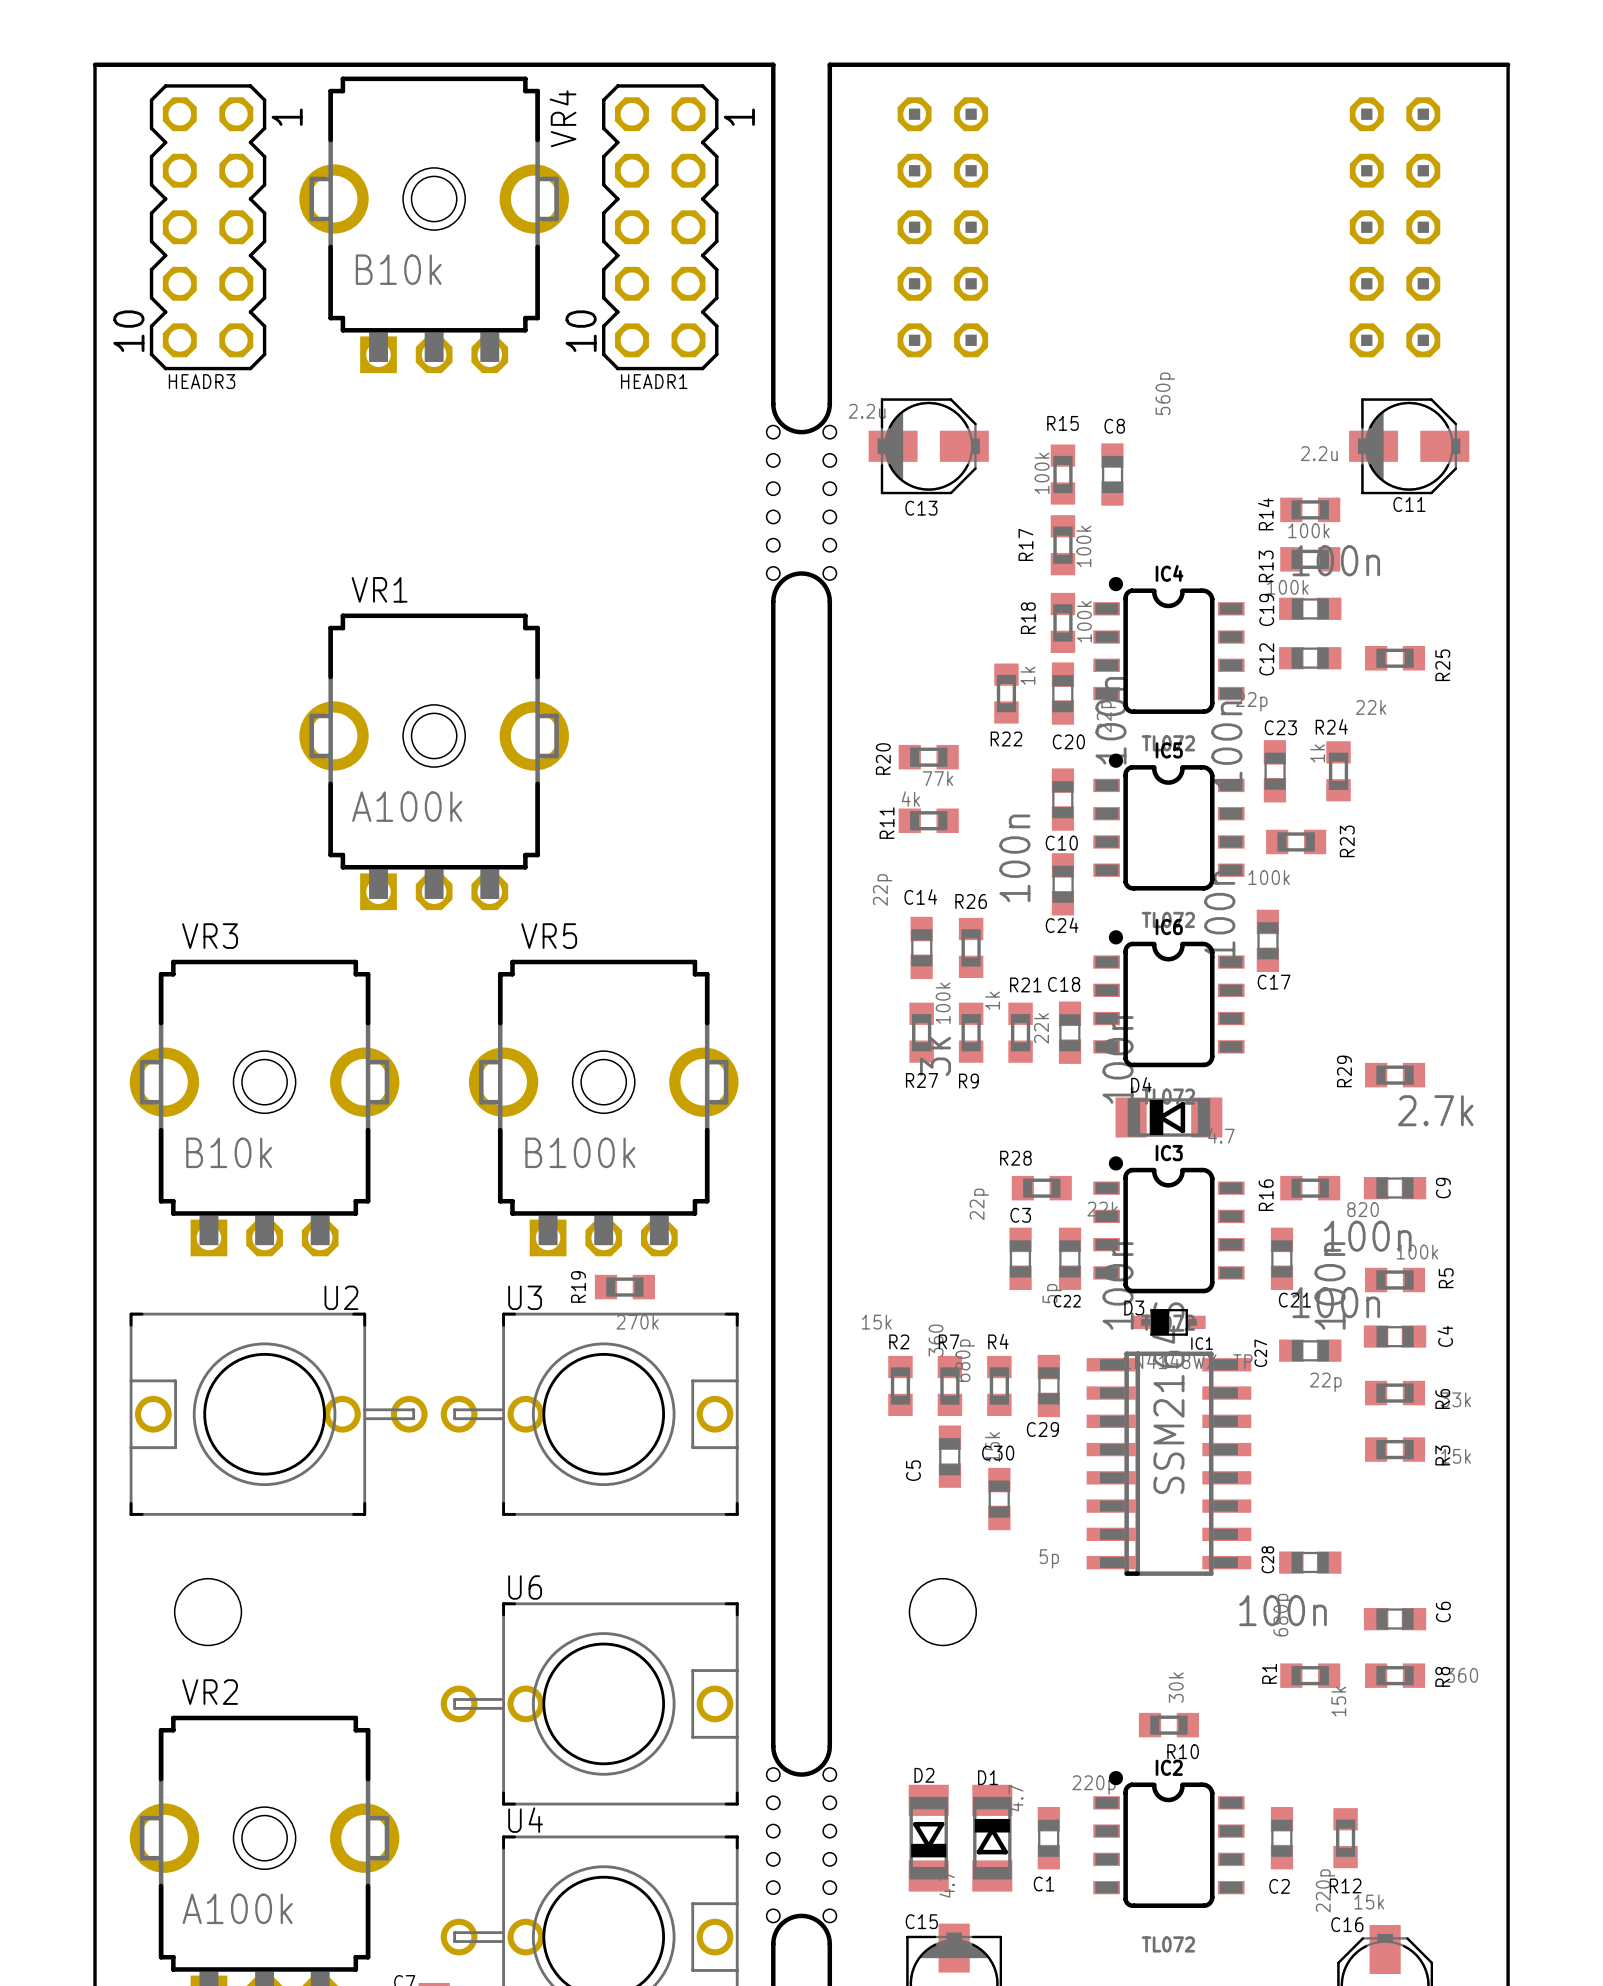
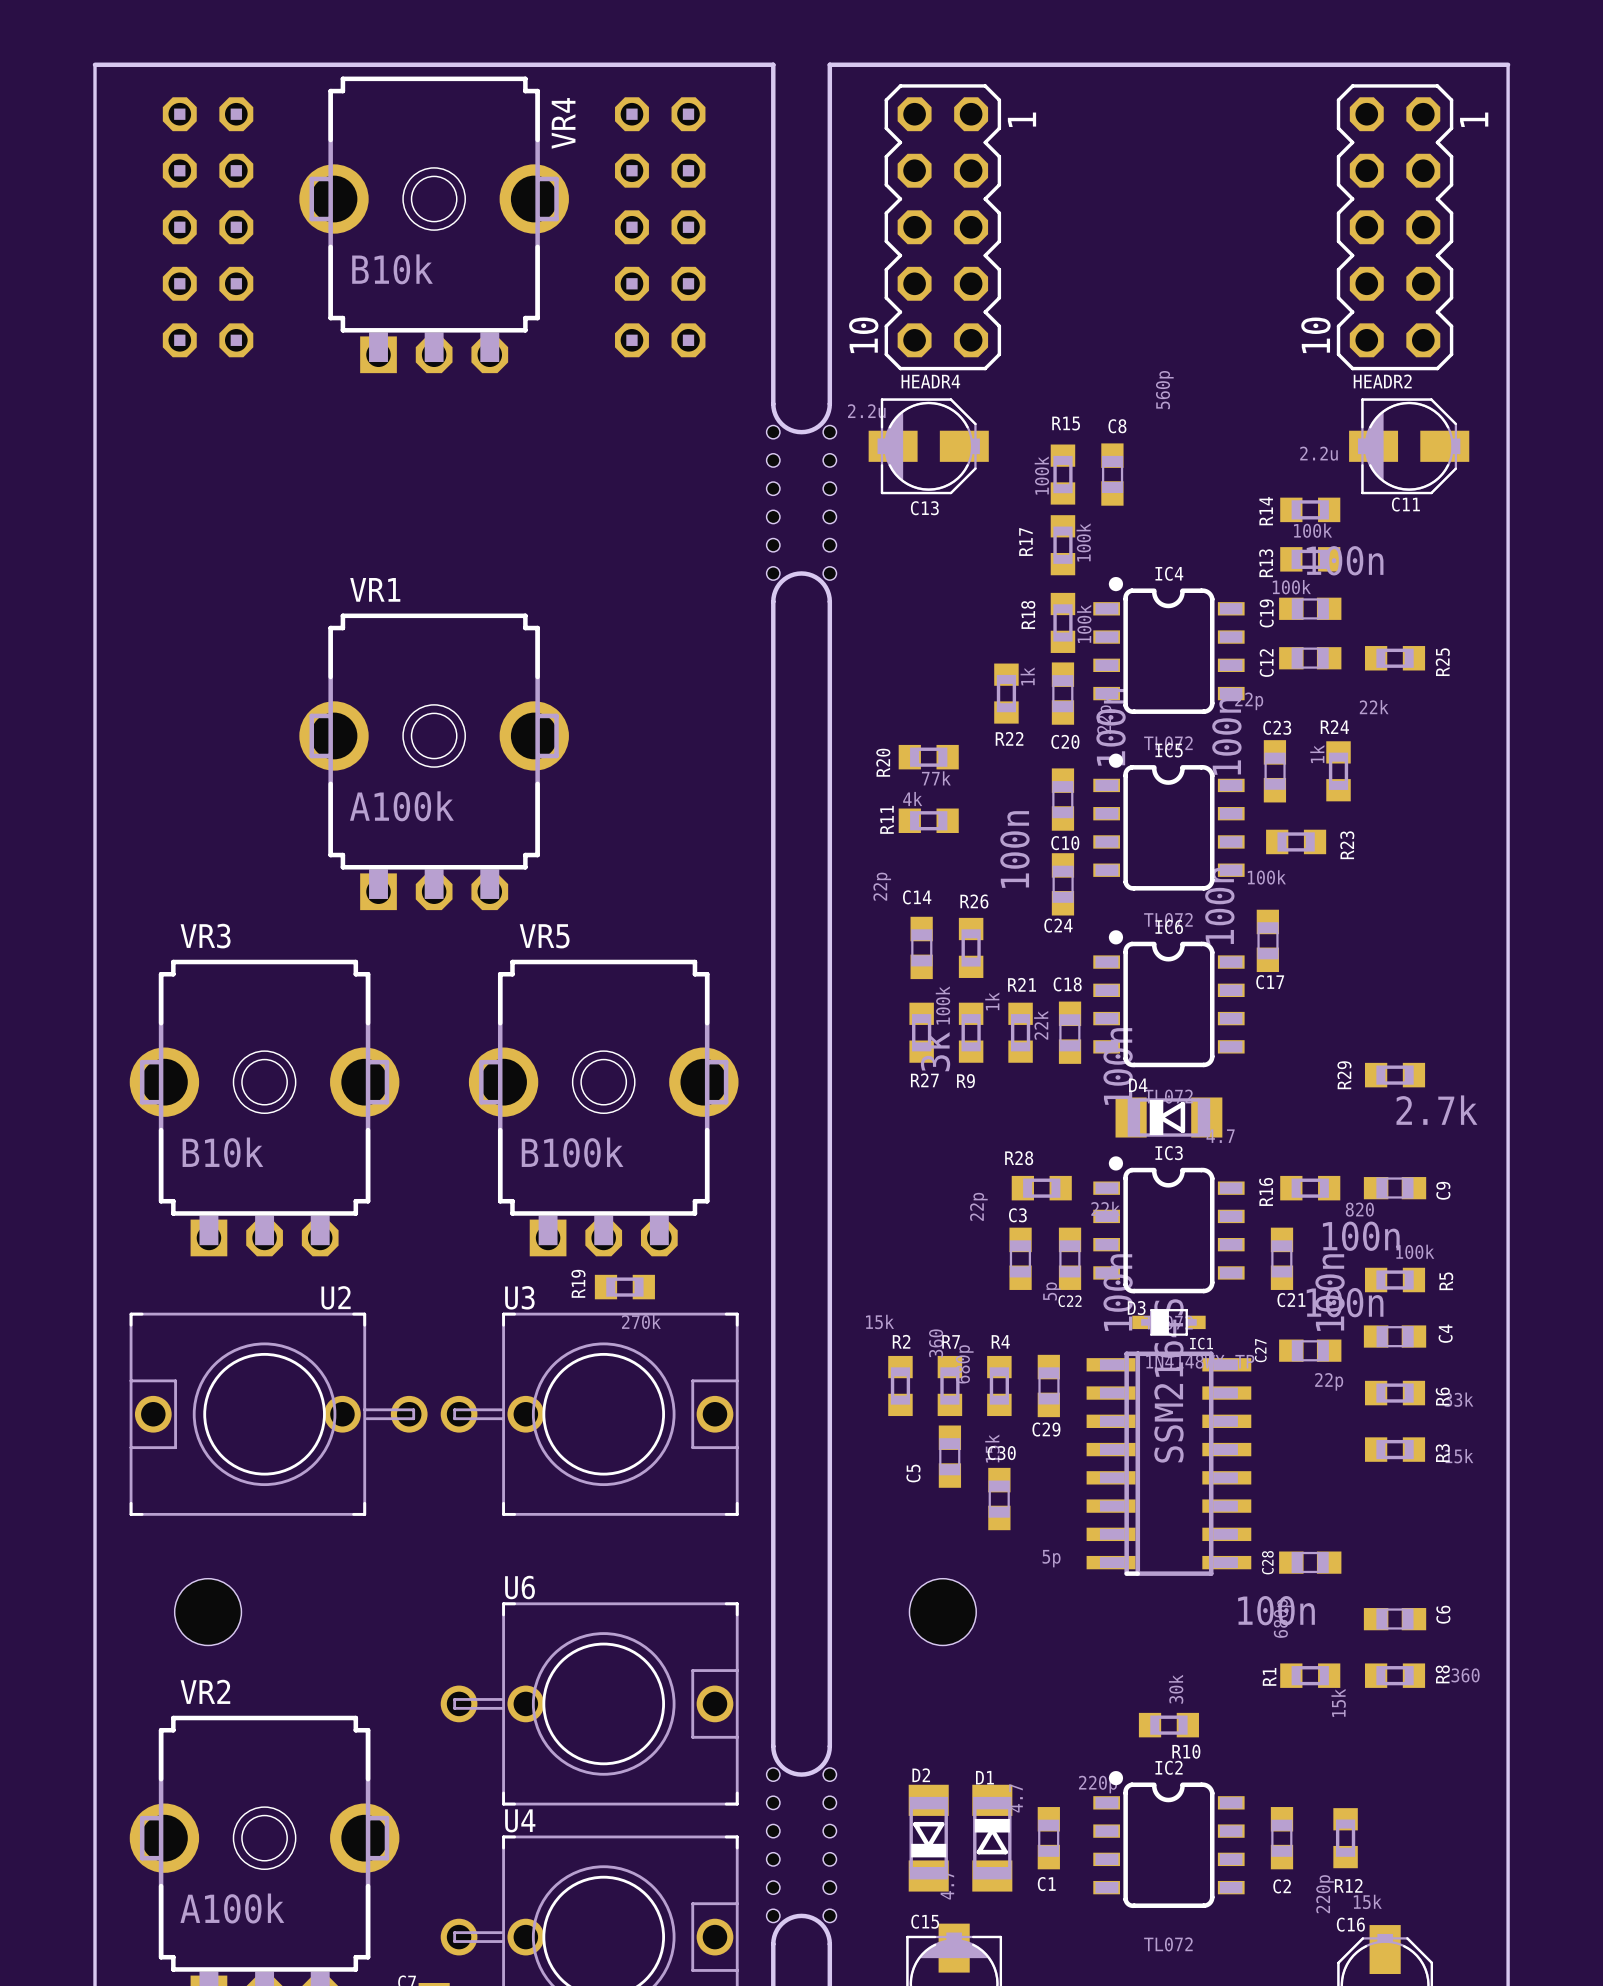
HEADR3 side: bottom (208, 227) -> top (208, 227)
HEADR1 side: bottom (660, 227) -> top (660, 227)
HEADR4 side: top (942, 227) -> bottom (942, 227)
HEADR2 side: top (1395, 227) -> bottom (1395, 227)

